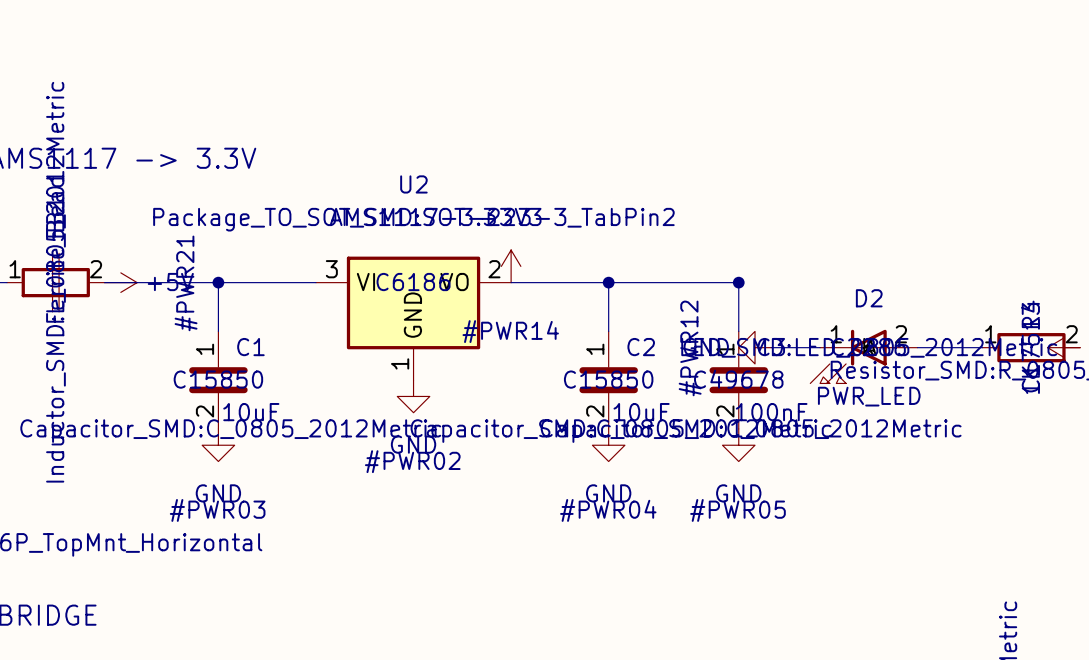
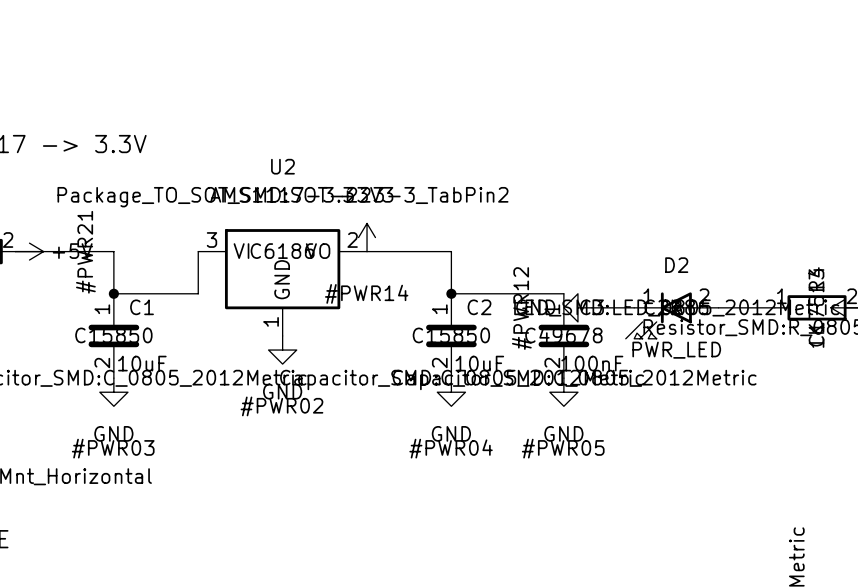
wire: (218, 282) (315, 282) -> (113, 293) (198, 293) (198, 251)
junction position: (218, 282) -> (113, 293)
wire: (608, 282) (738, 282) (738, 331) -> (451, 293) (563, 293)
junction position: (608, 282) -> (451, 293)
junction: (738, 282) -> none

